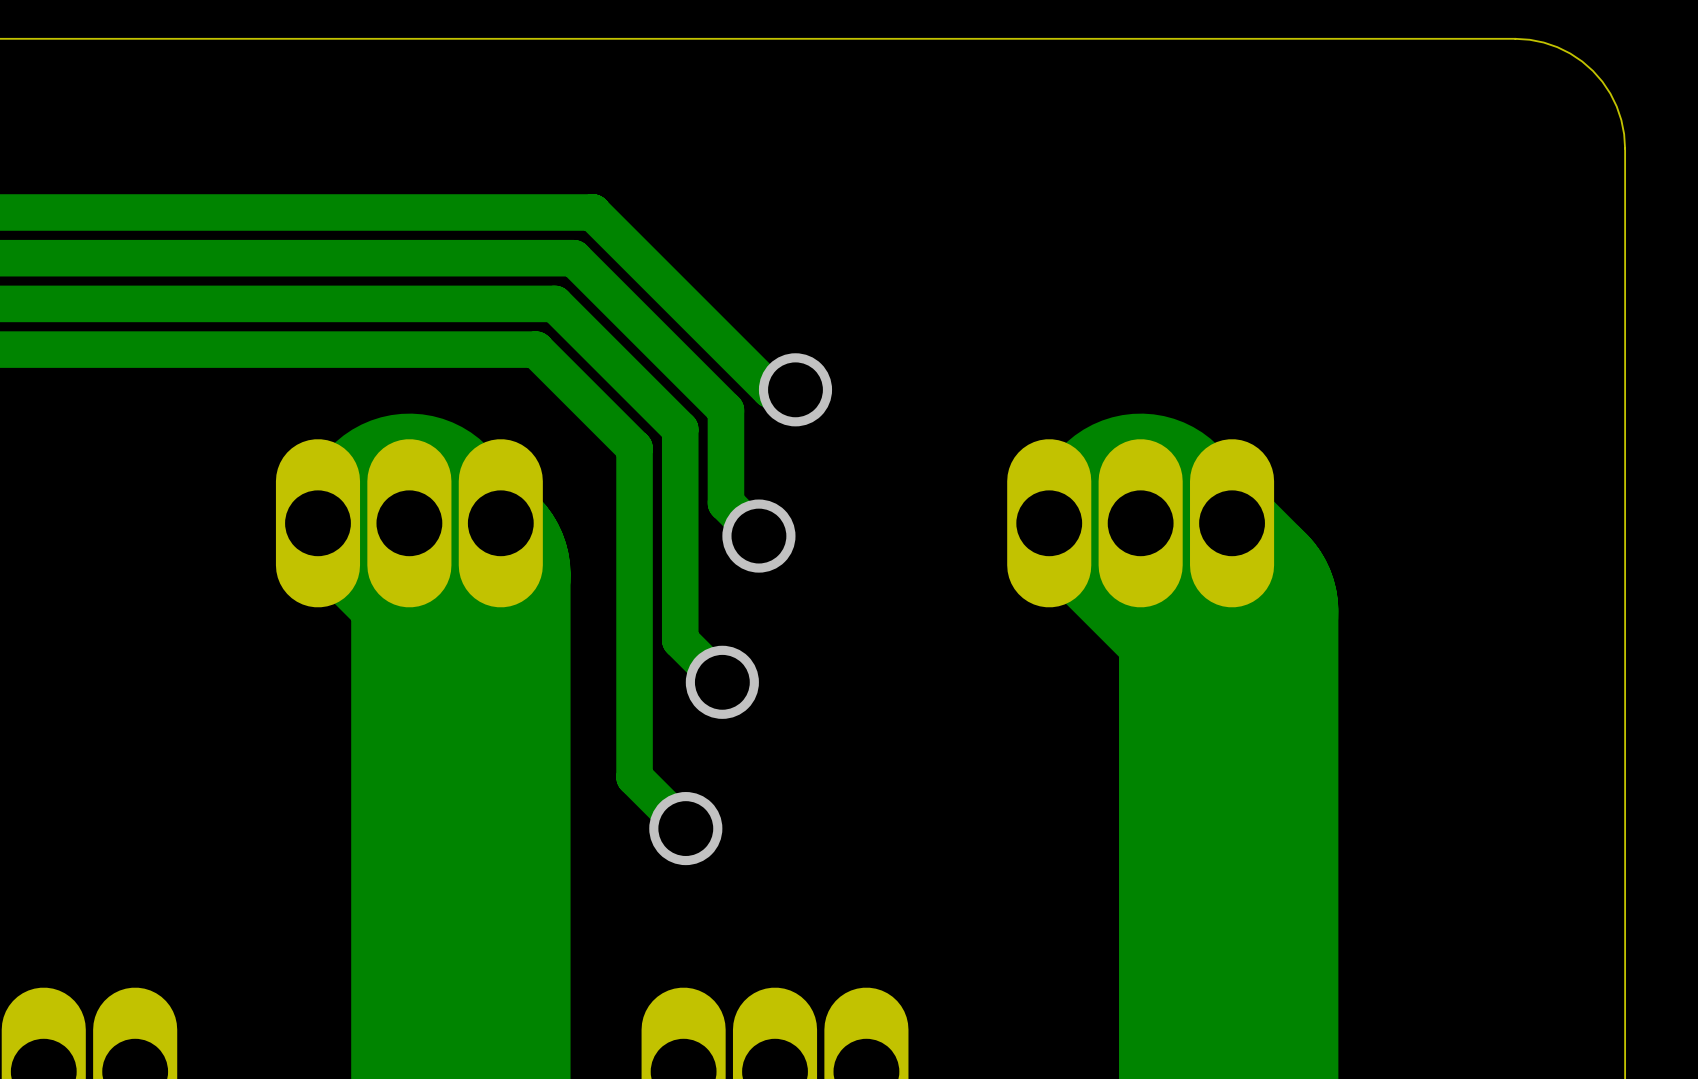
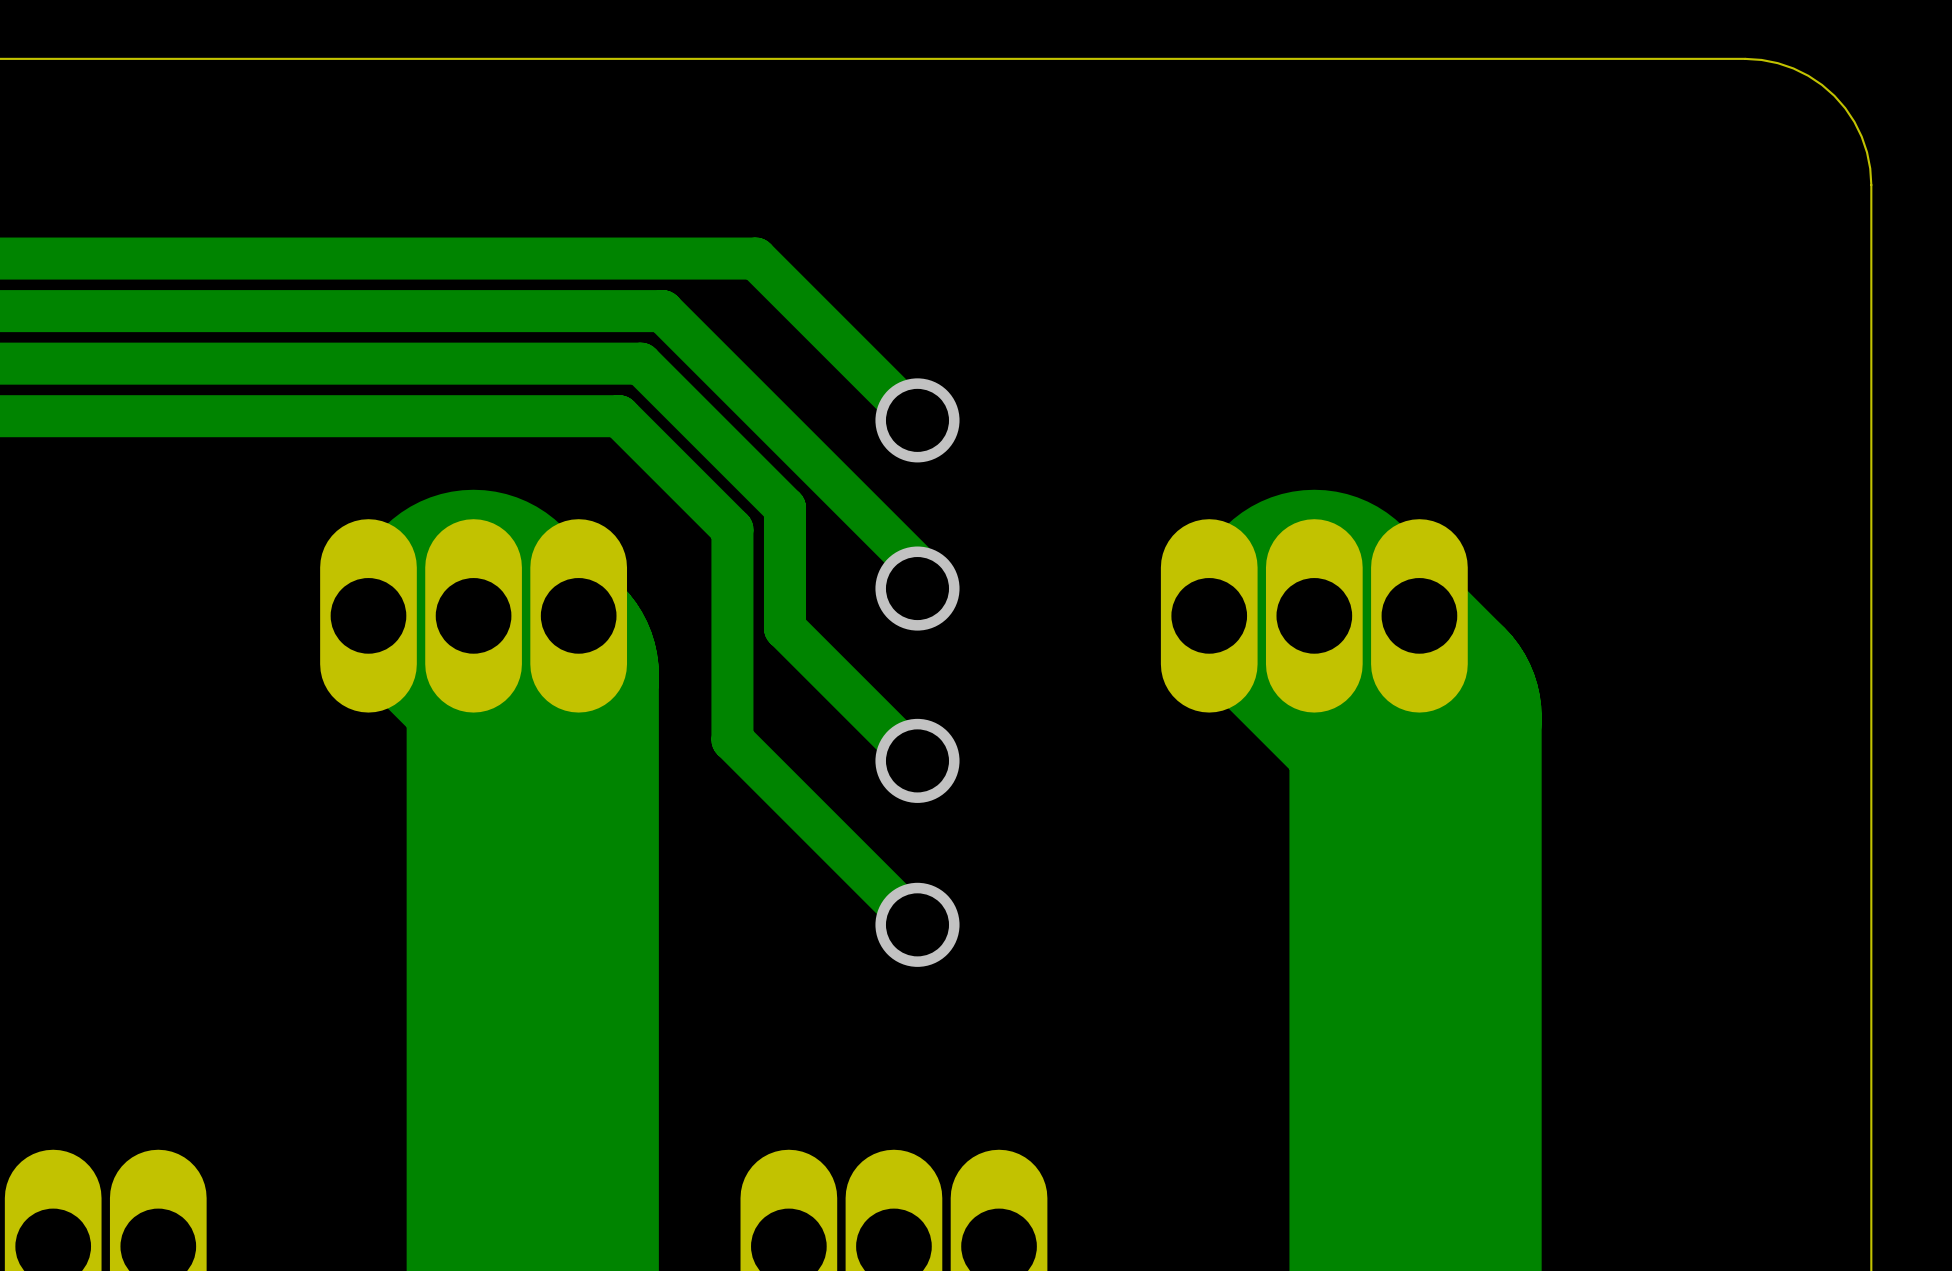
track: (592, 212) (770, 389) (795, 389) -> (684, 258) (755, 258) (917, 420)
via position: (795, 389) -> (917, 420)
track: (725, 410) (725, 503) (758, 536) -> (837, 486) (917, 566) (917, 588)
track: (680, 534) (680, 640) (722, 682) -> (784, 628) (917, 760)
via position: (758, 536) -> (917, 588)
track: (634, 631) (634, 777) (685, 828) -> (732, 739) (917, 924)
via: none -> (917, 760)
via: (722, 682) -> none
via: none -> (917, 924)
via: (685, 828) -> none

